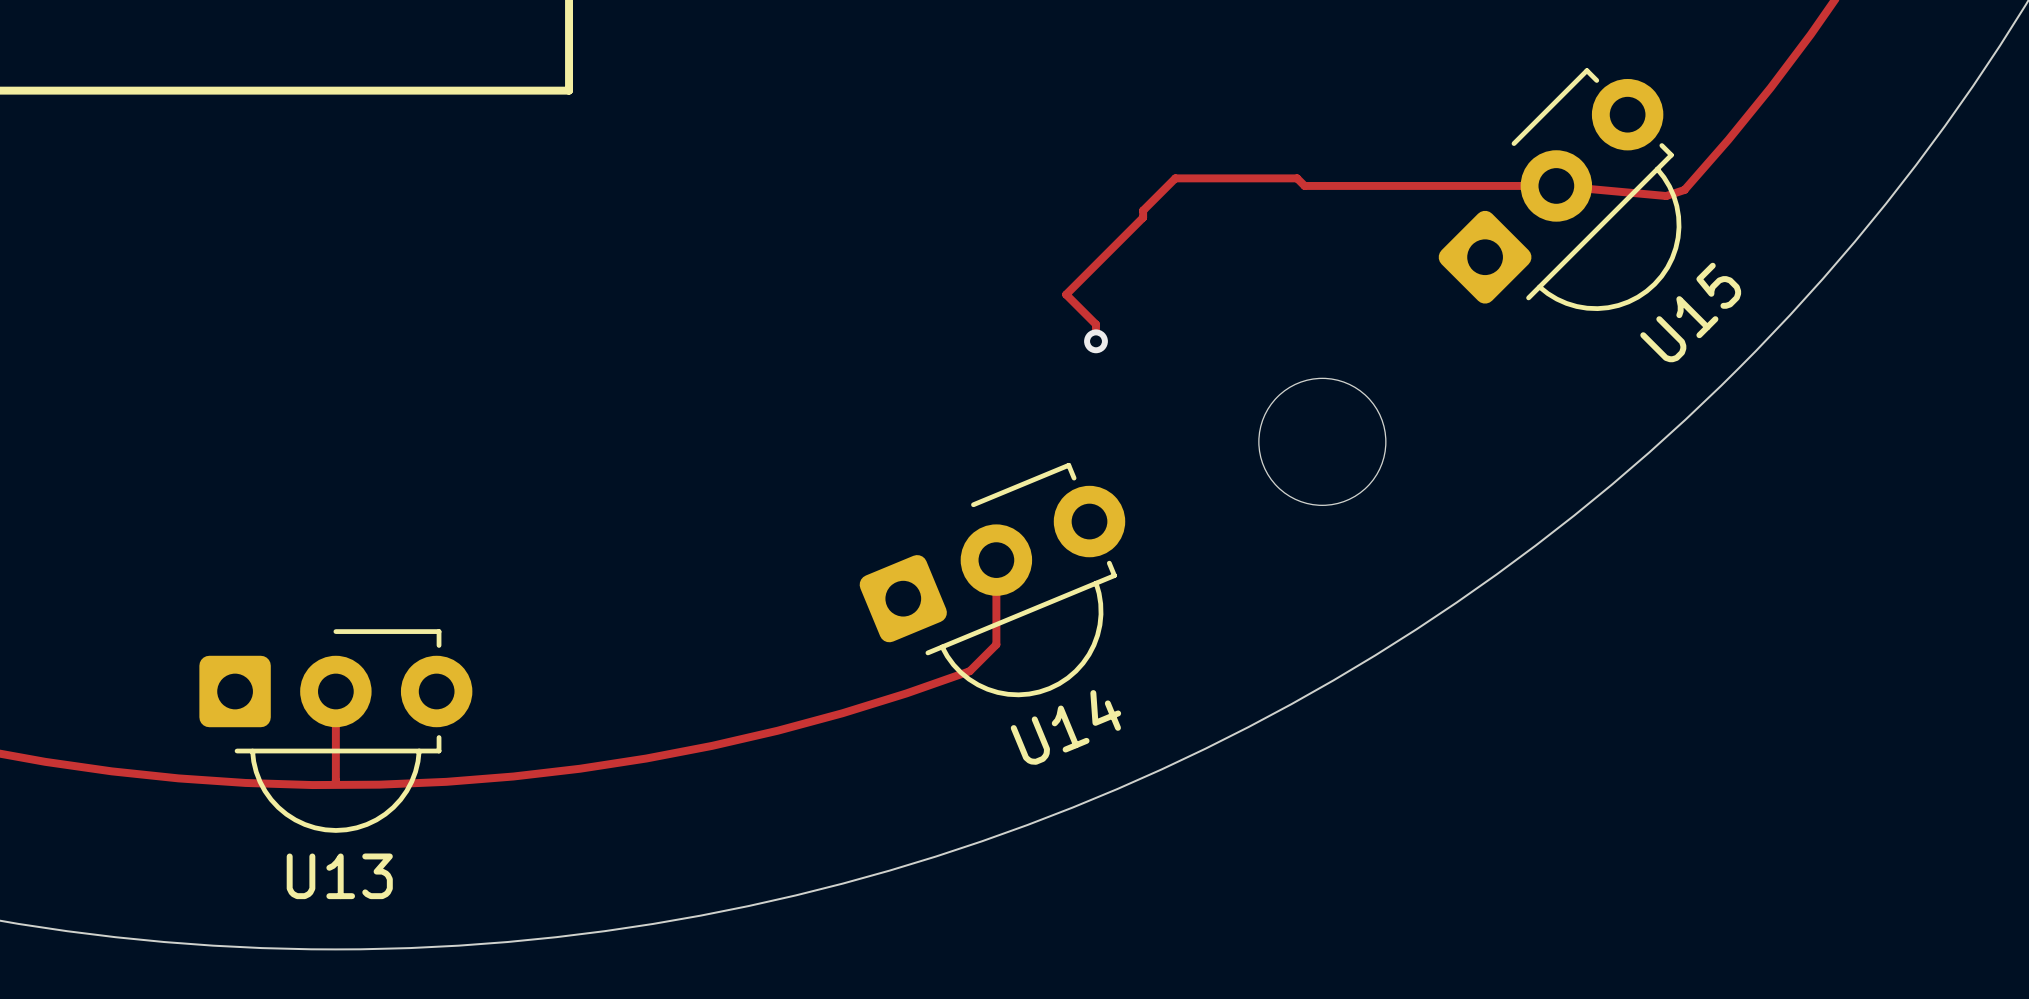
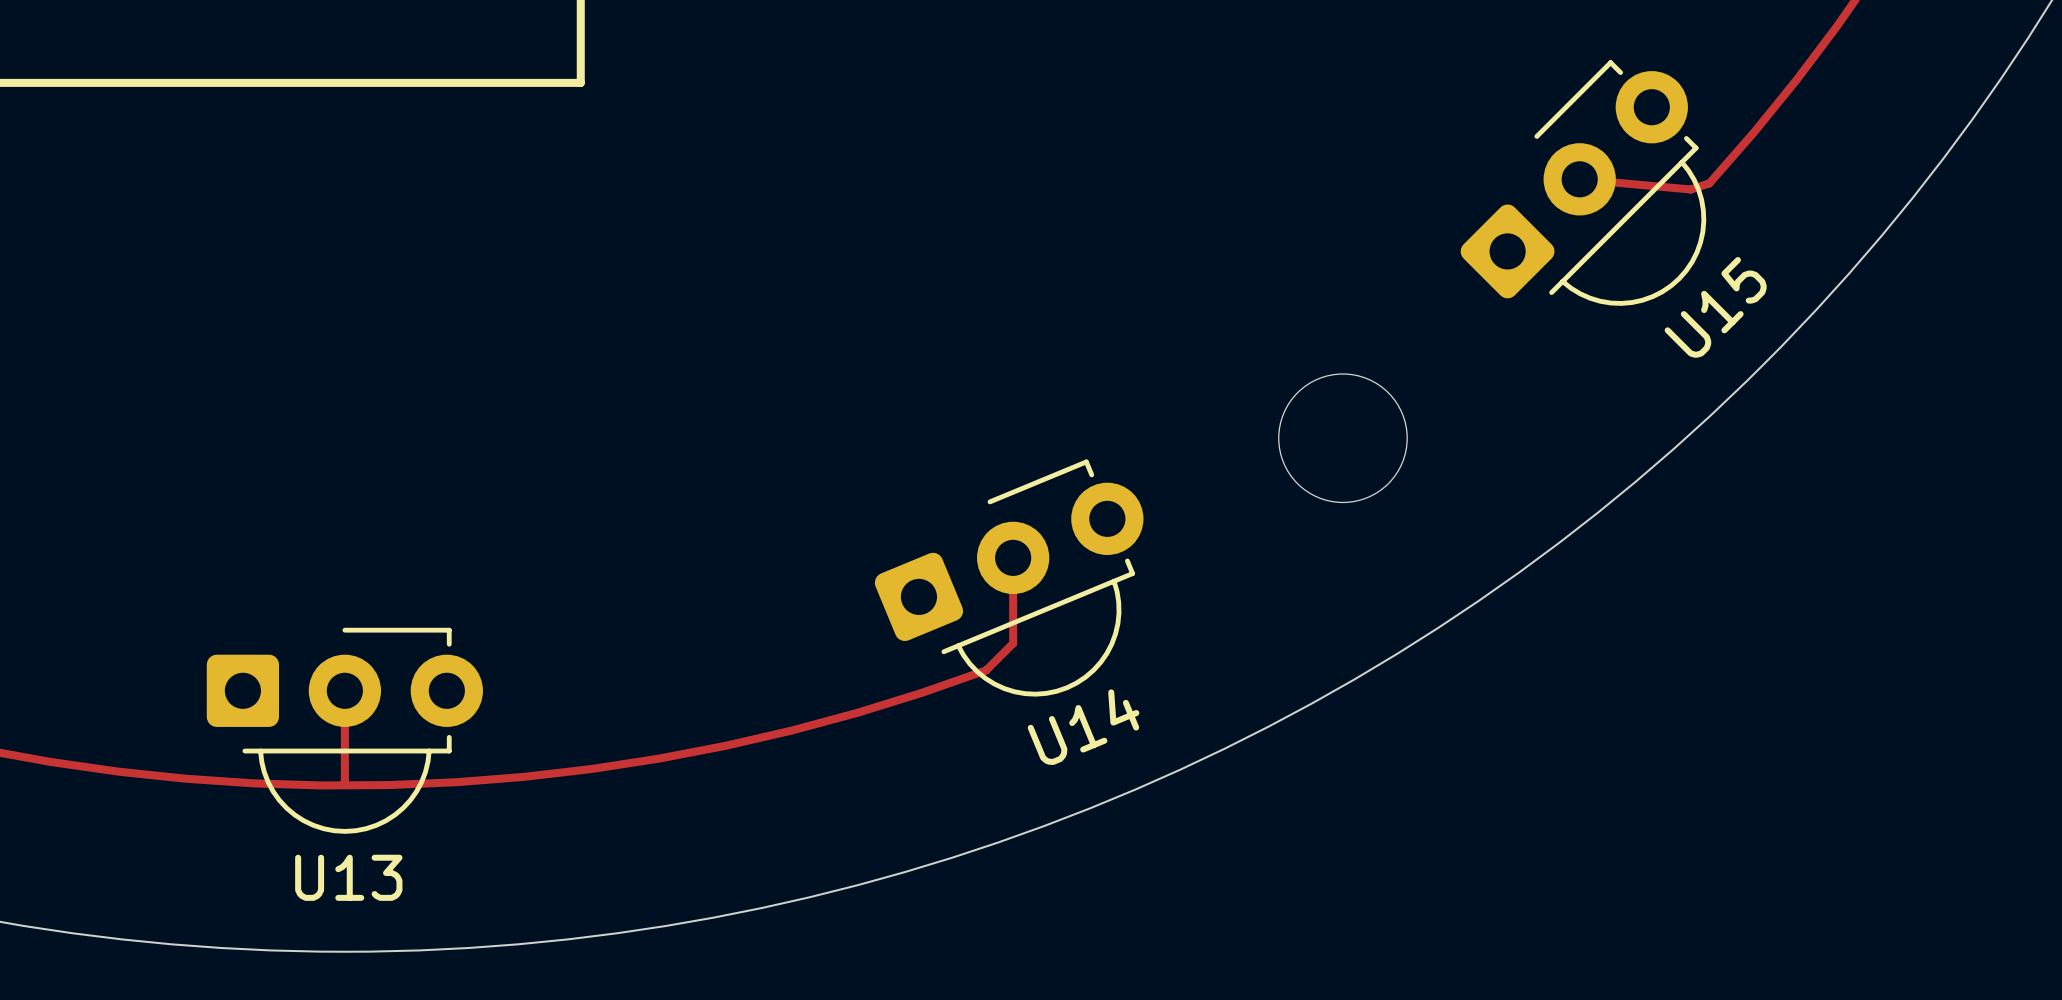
track: (1556, 185) (1304, 185) (1297, 178) (1175, 178) (1143, 210) (1143, 217) (1066, 294) (1096, 324) (1096, 341) -> none
via: (1096, 341) -> none

